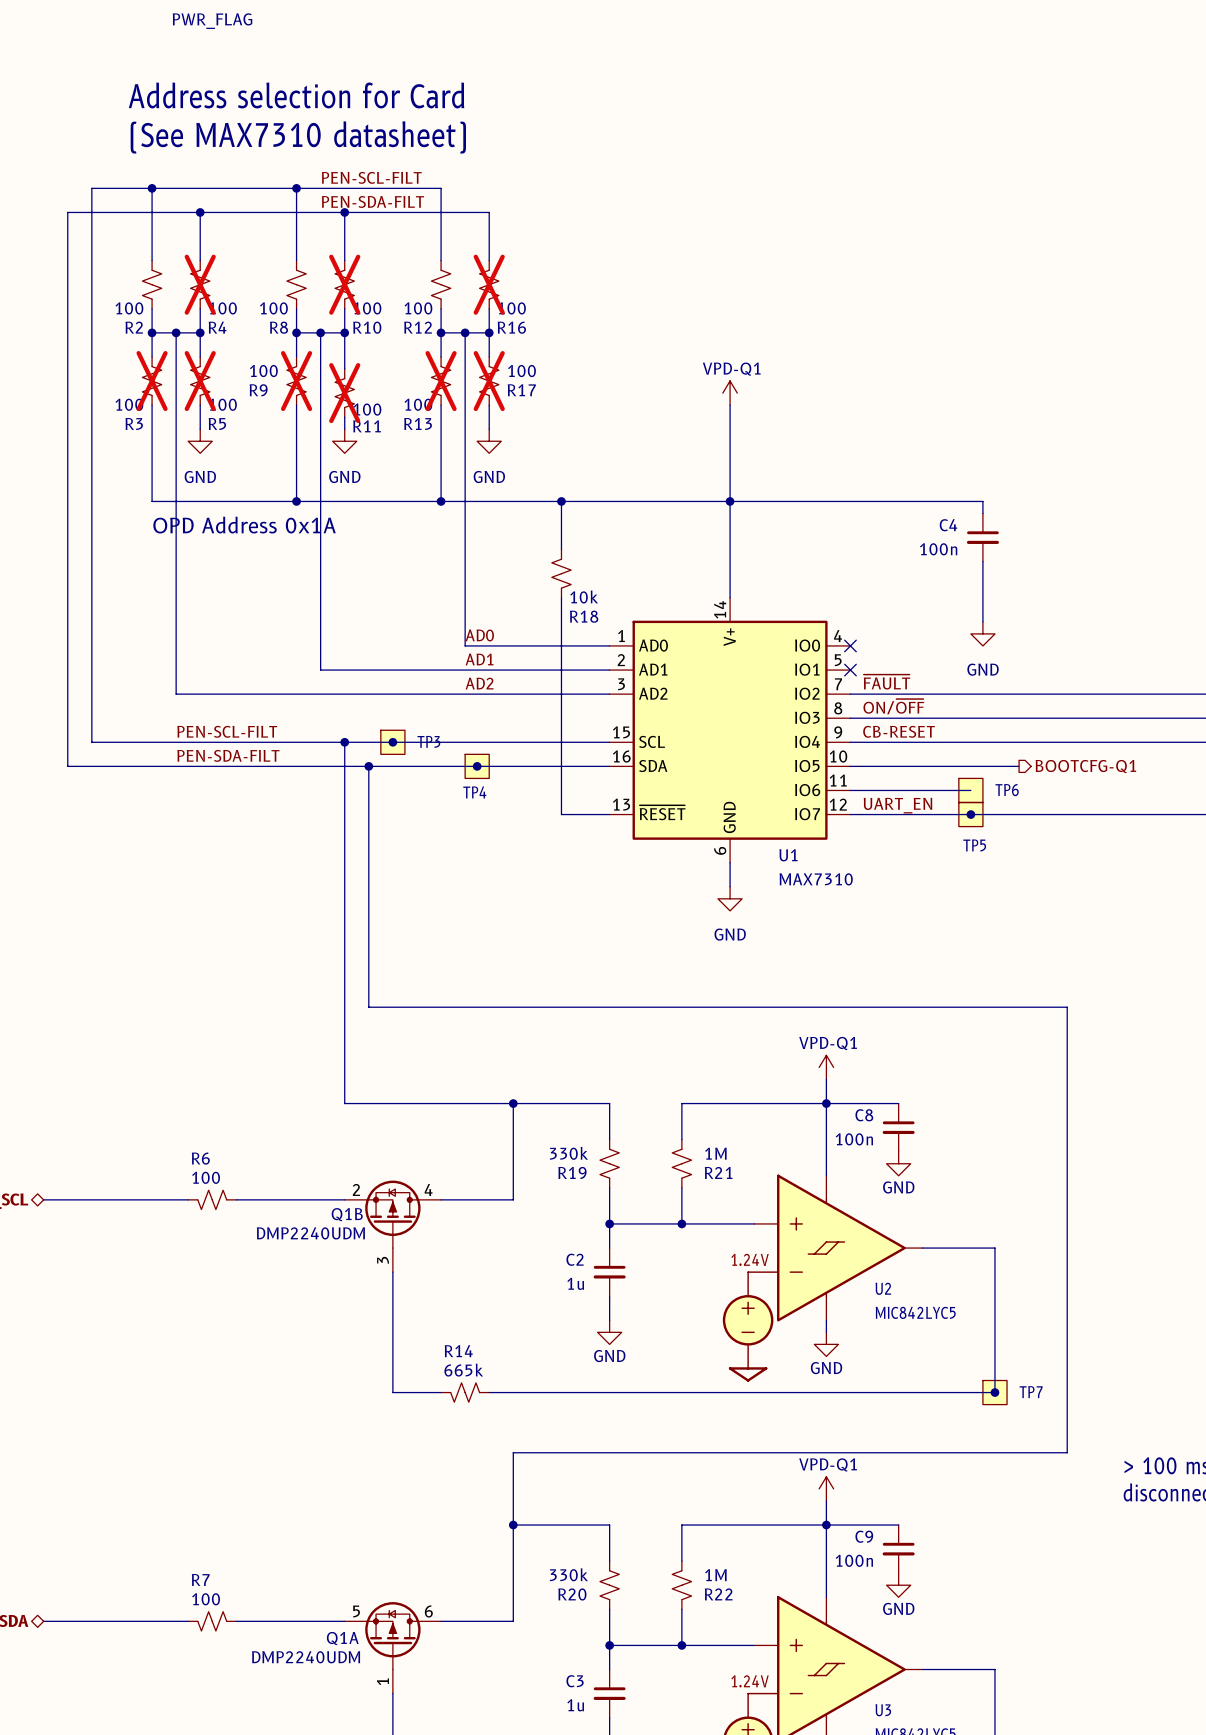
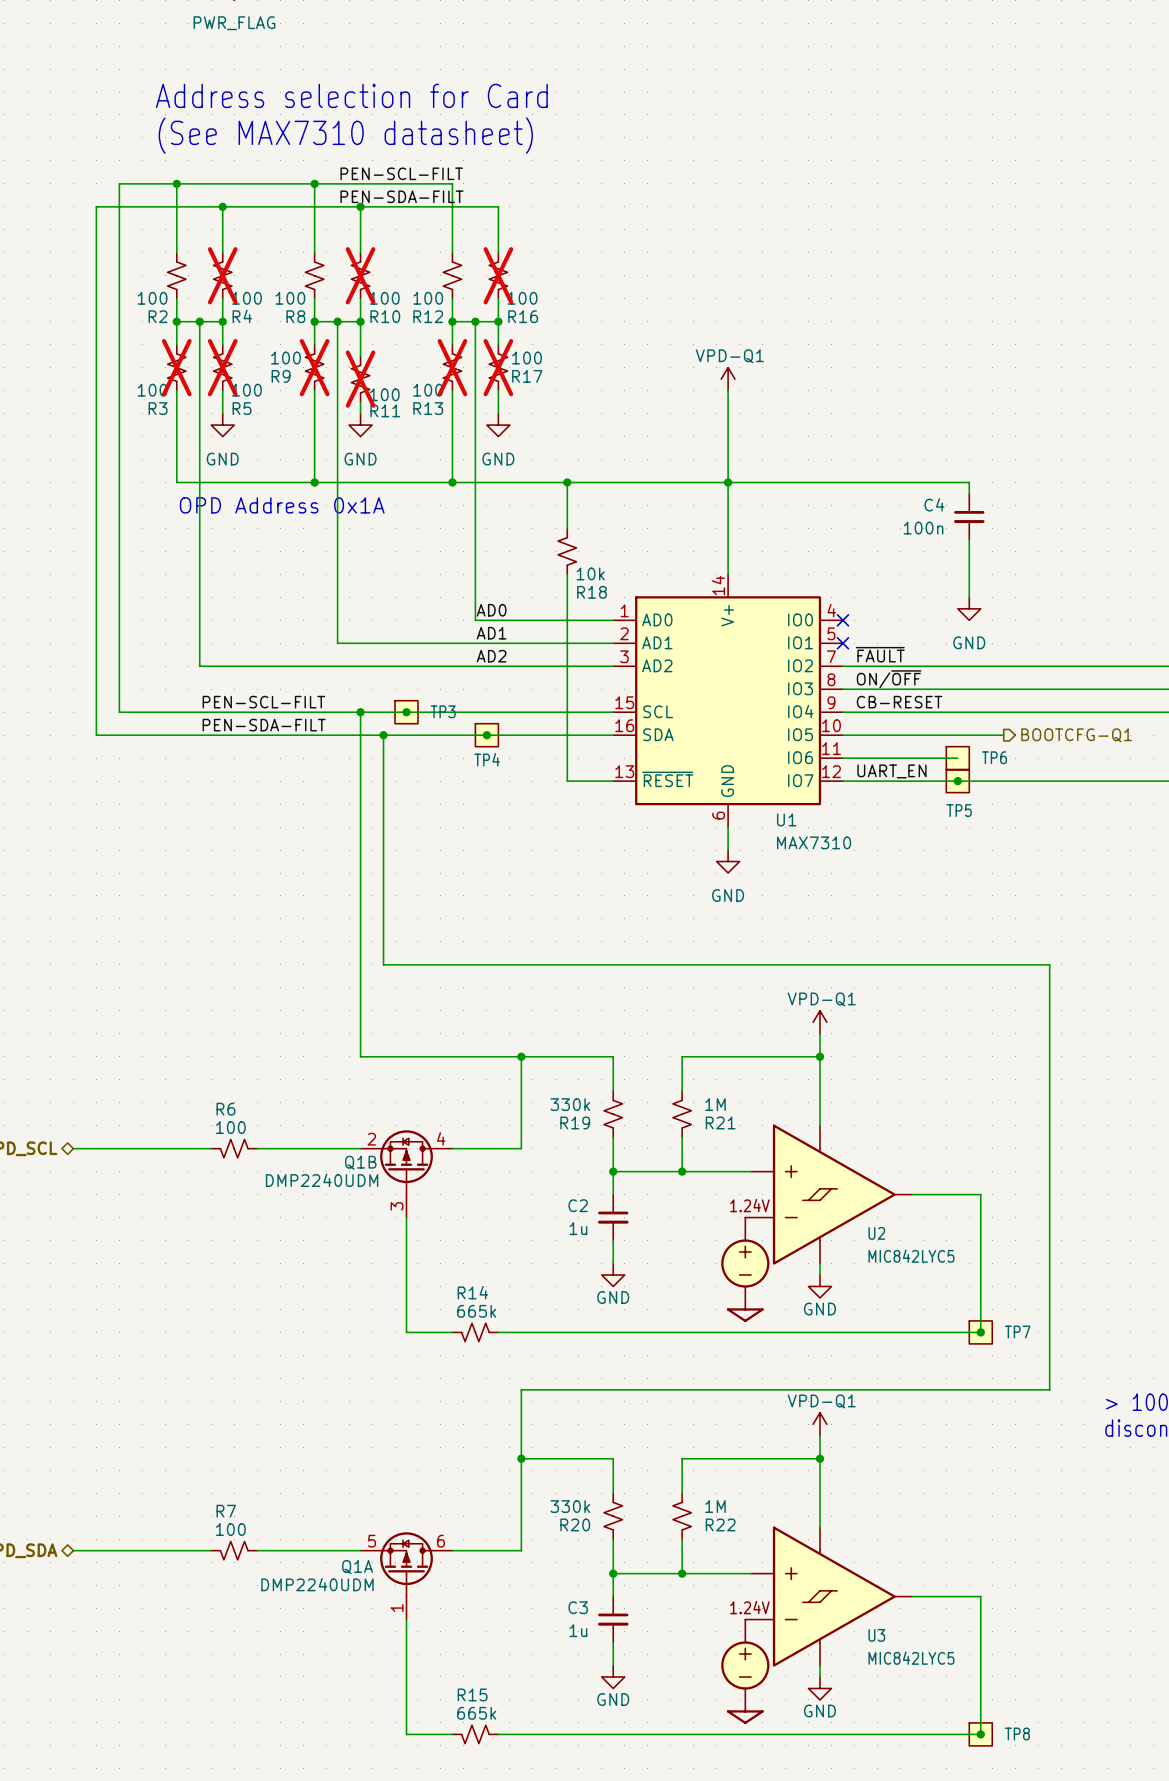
wire: (826, 1103) (898, 1103) -> none
C8: 100n (898, 1127) -> none
power symbol: GND (898, 1163) -> none
wire: (826, 1525) (898, 1525) -> none
C9: 100n (898, 1549) -> none
power symbol: GND (898, 1585) -> none

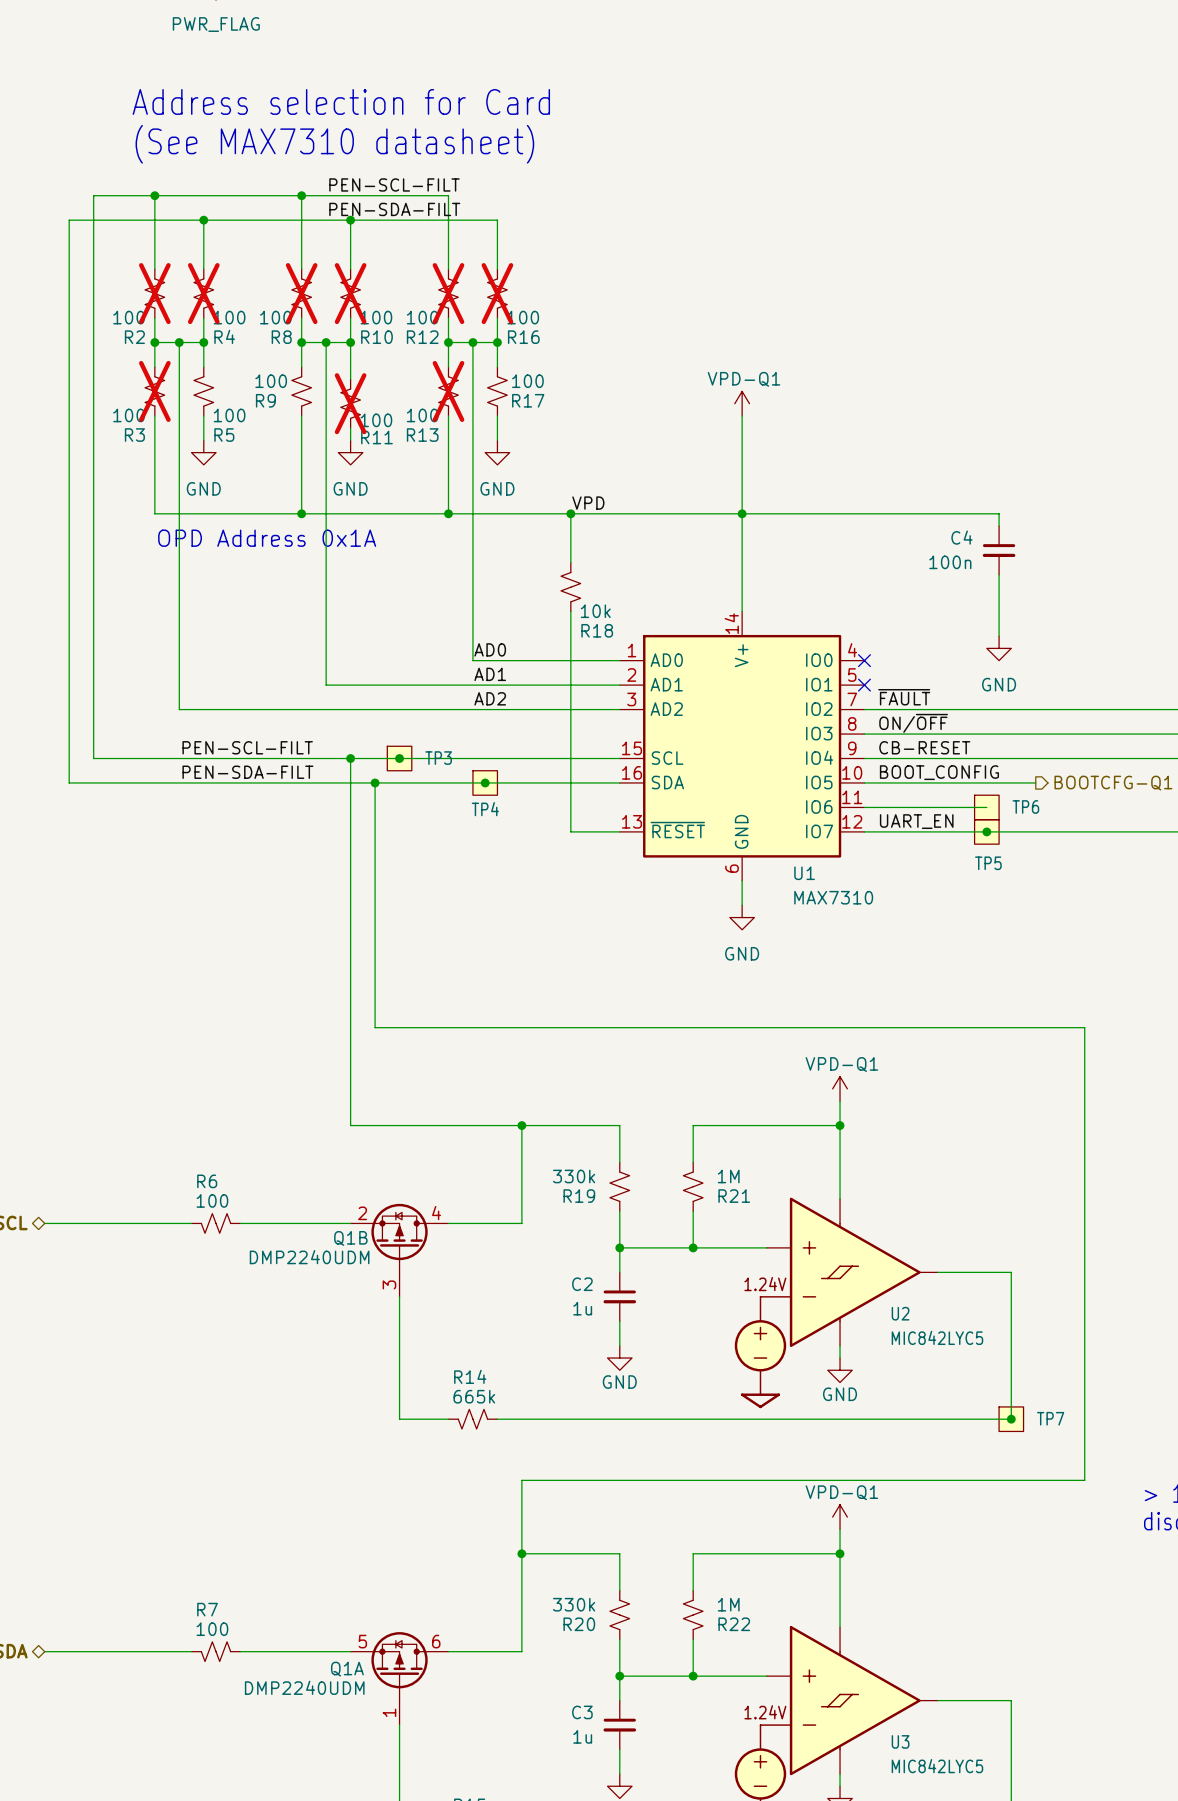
R2 do-not-place cross: none -> (154, 293)
R8 do-not-place cross: none -> (301, 293)
R12 do-not-place cross: none -> (448, 293)
R5 do-not-place cross: (222, 367) -> none
R9 do-not-place cross: (314, 367) -> none
R17 do-not-place cross: (498, 367) -> none
label: none -> VPD (588, 503)
label: none -> BOOT_CONFIG (939, 772)

